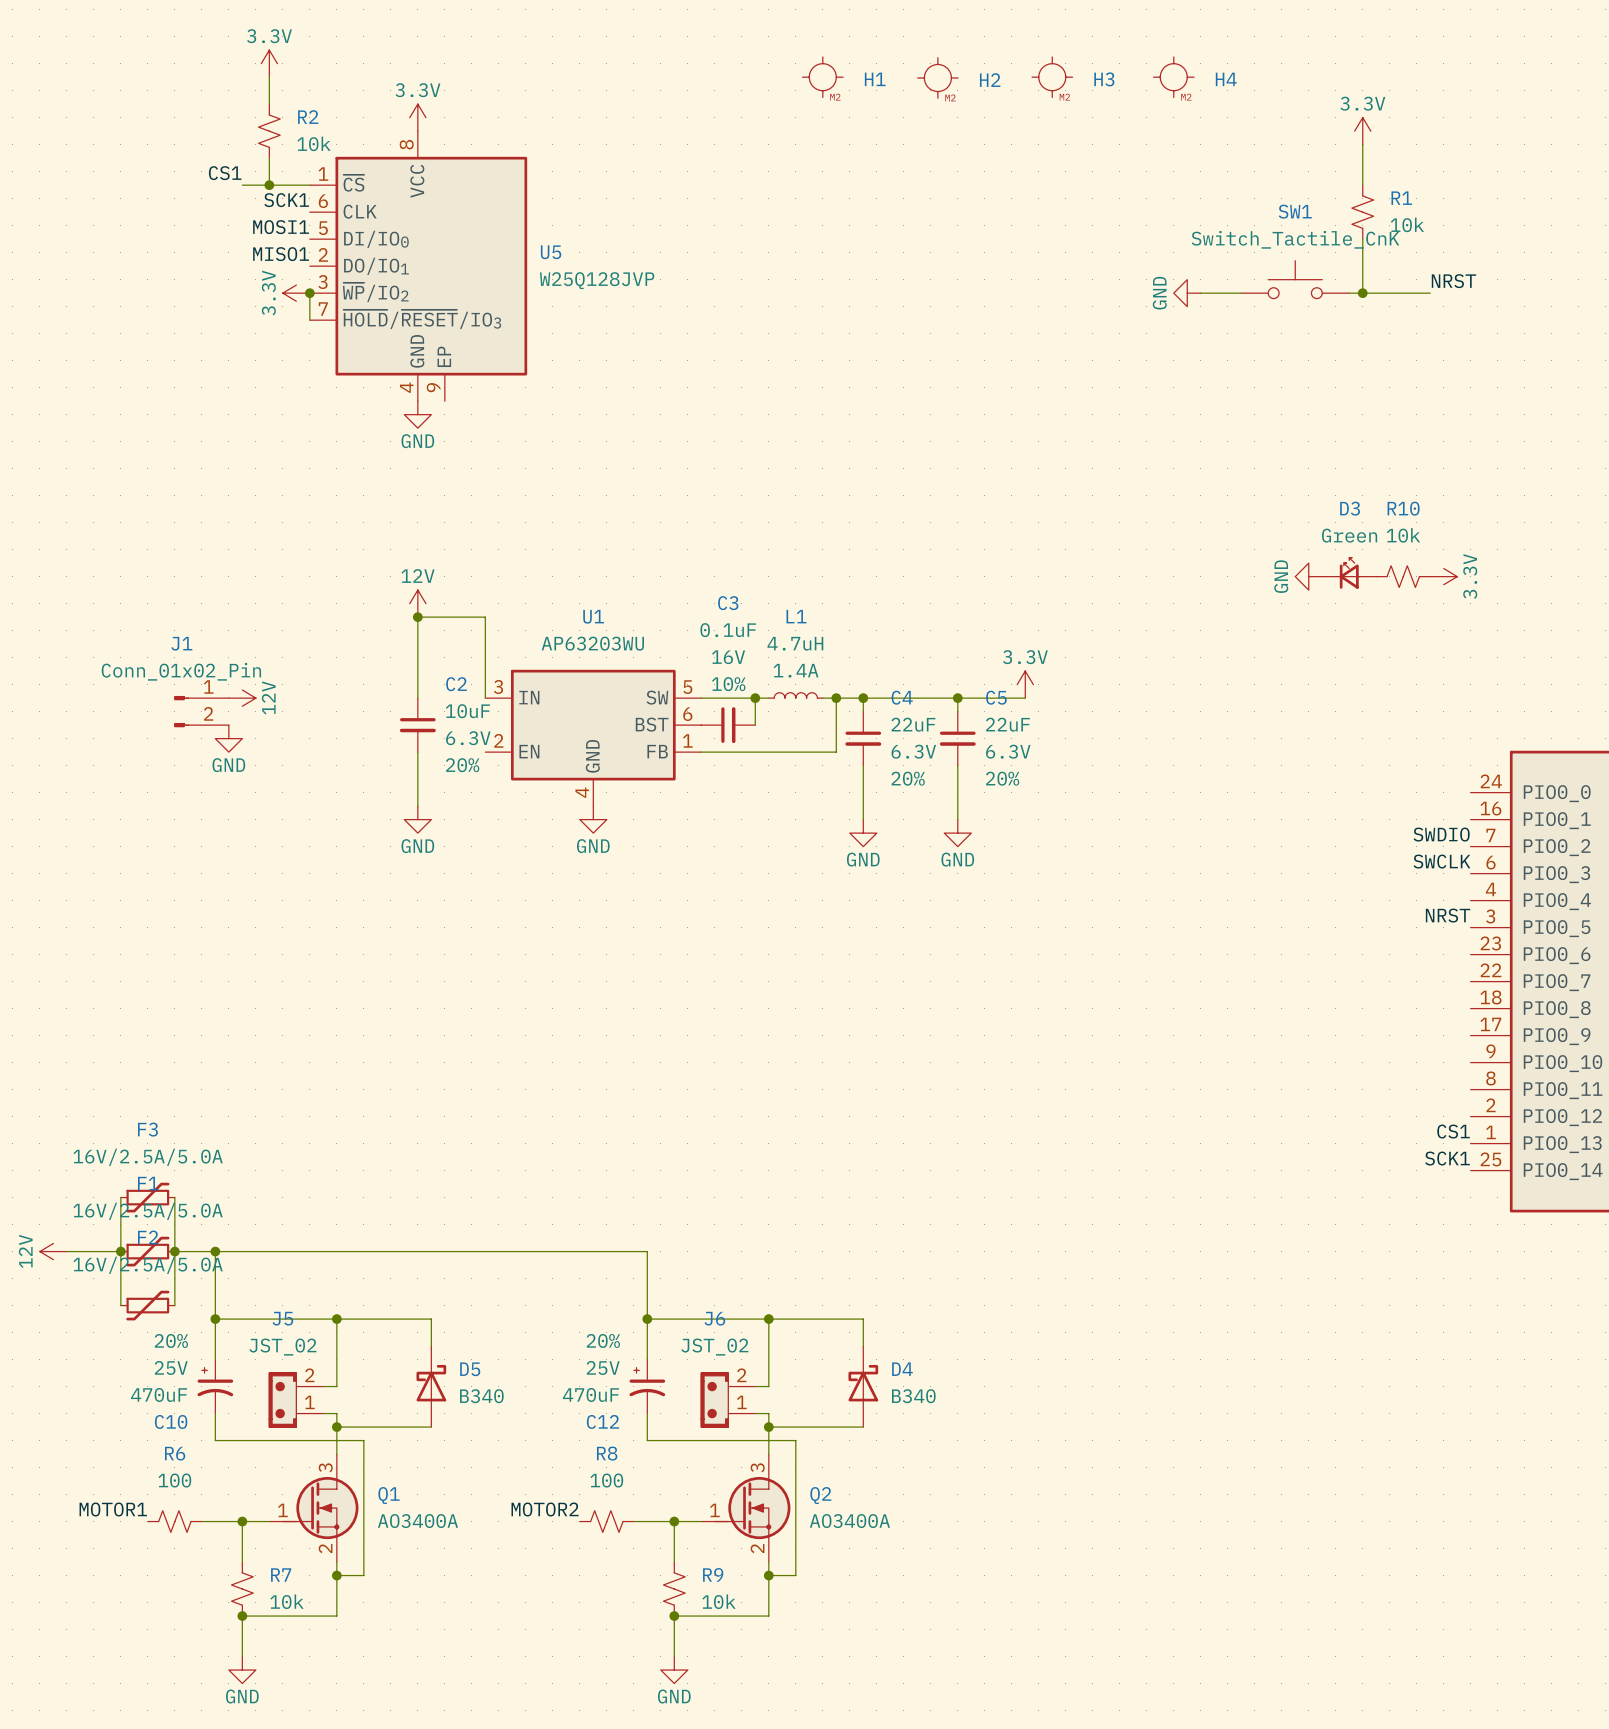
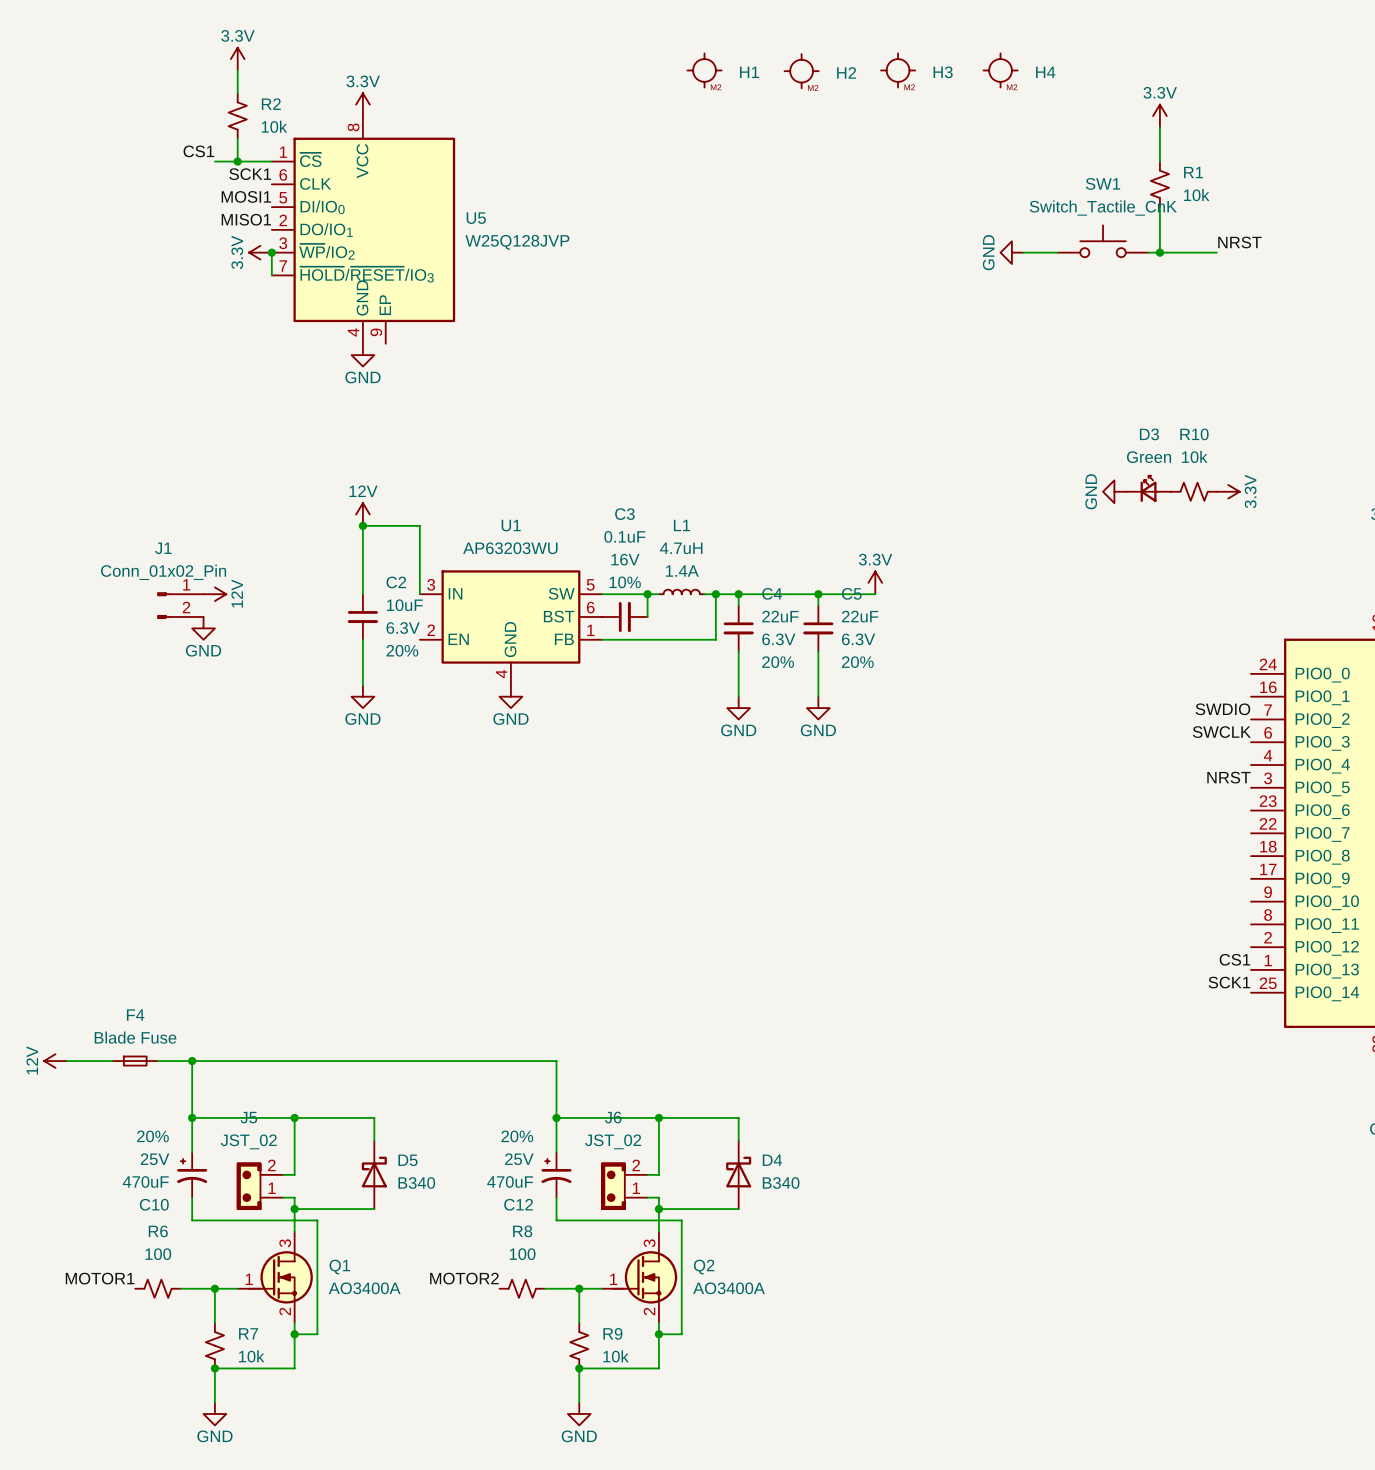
wire: (120, 1197) (120, 1305) -> none
F3: 16V/2.5A/5.0A (147, 1197) -> none
wire: (174, 1197) (174, 1305) -> none
junction: (120, 1251) -> none
F1: 16V/2.5A/5.0A (147, 1251) -> none
F4: none -> Blade Fuse (135, 1061)
junction: (174, 1251) -> none
F2: 16V/2.5A/5.0A (147, 1305) -> none

